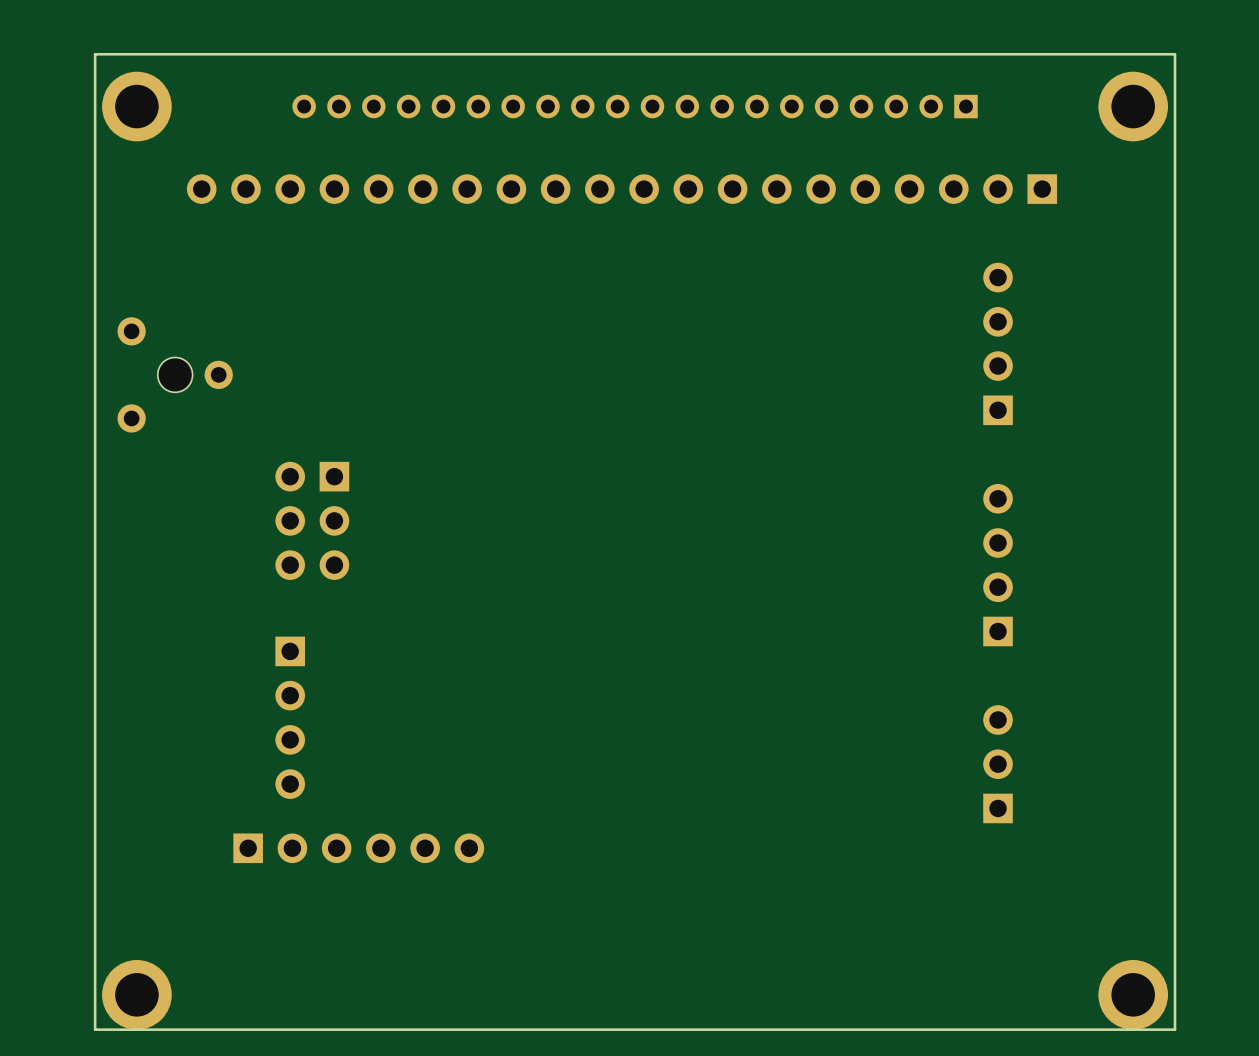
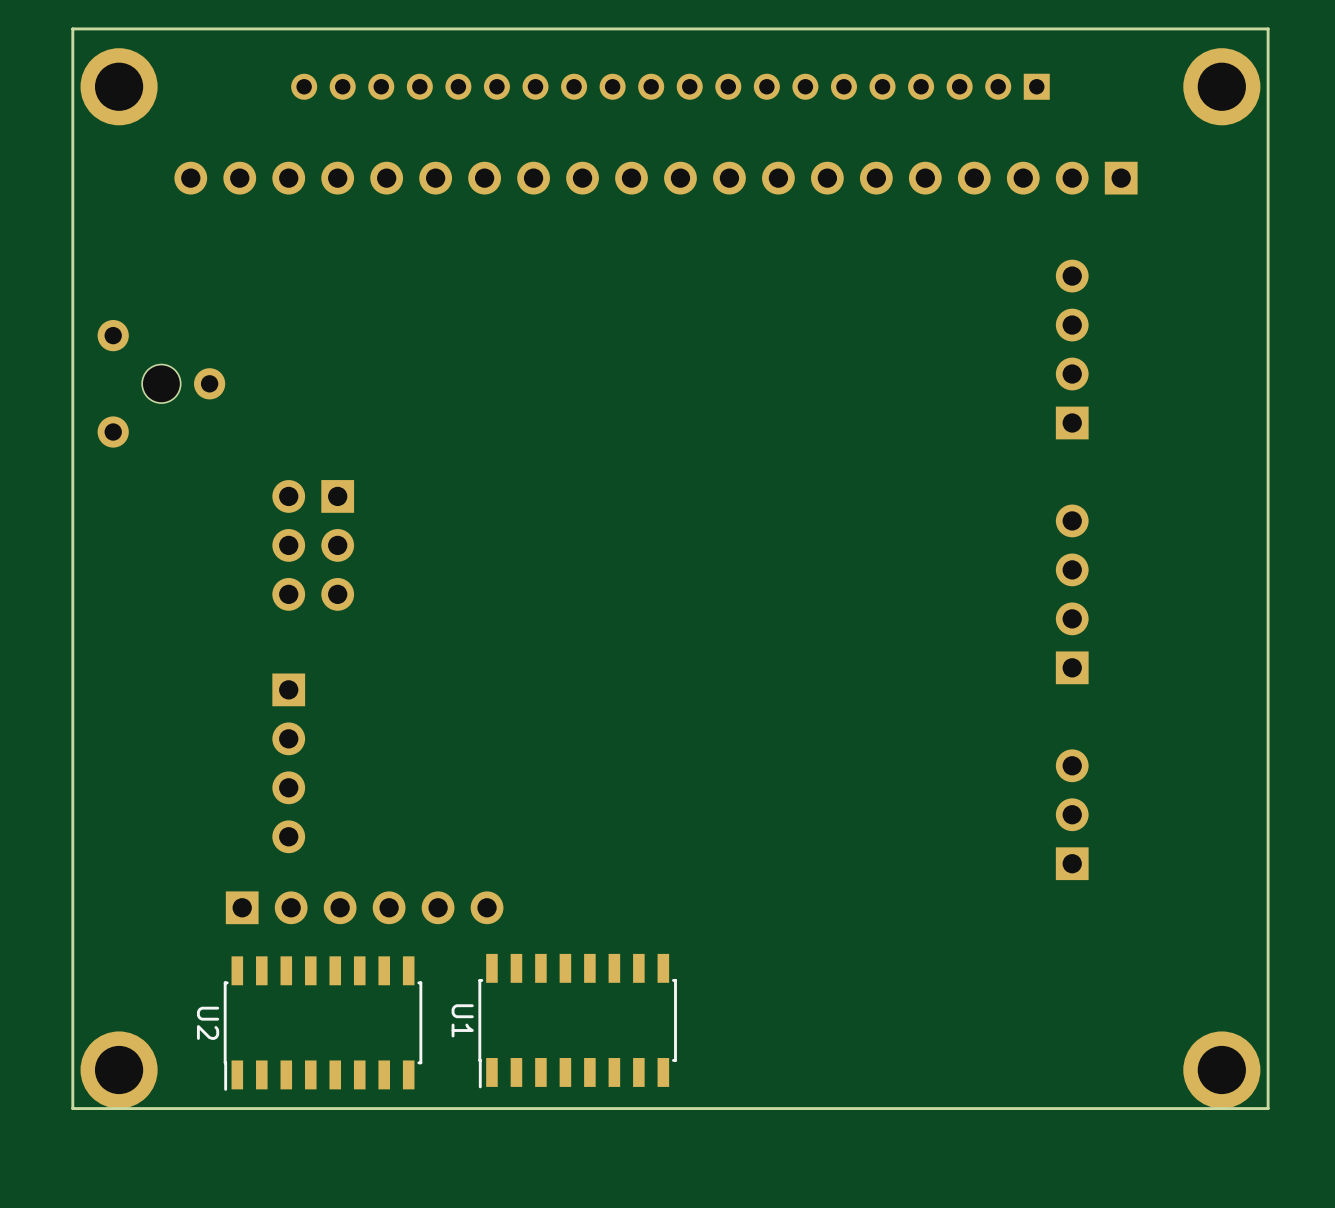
U1: none -> (577, 1021)
U2: none -> (323, 1023)

